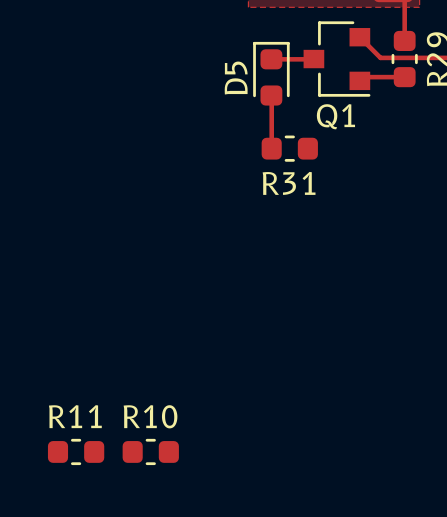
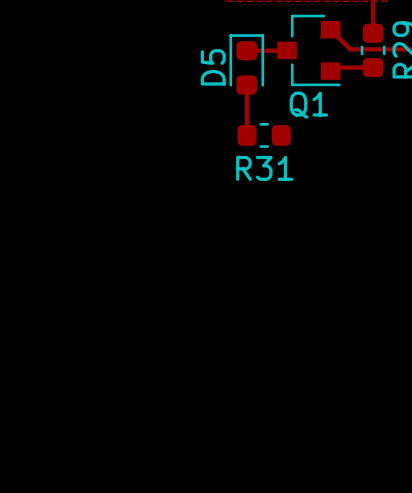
R11: (76, 451) -> none
R10: (150, 451) -> none

